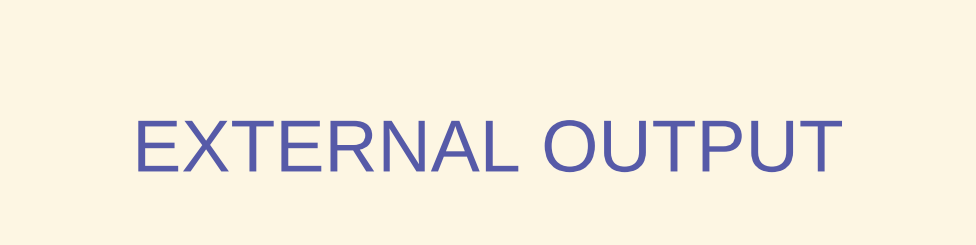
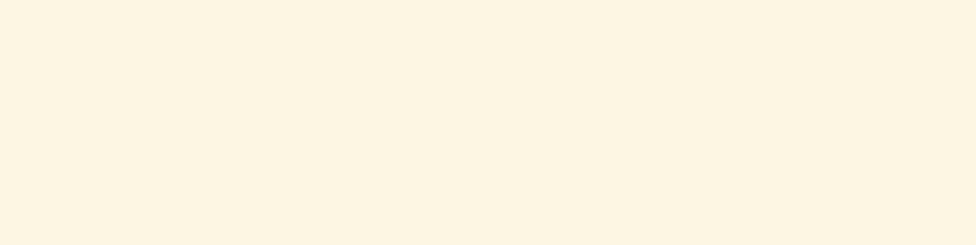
text: EXTERNAL OUTPUT (490, 146) -> none

